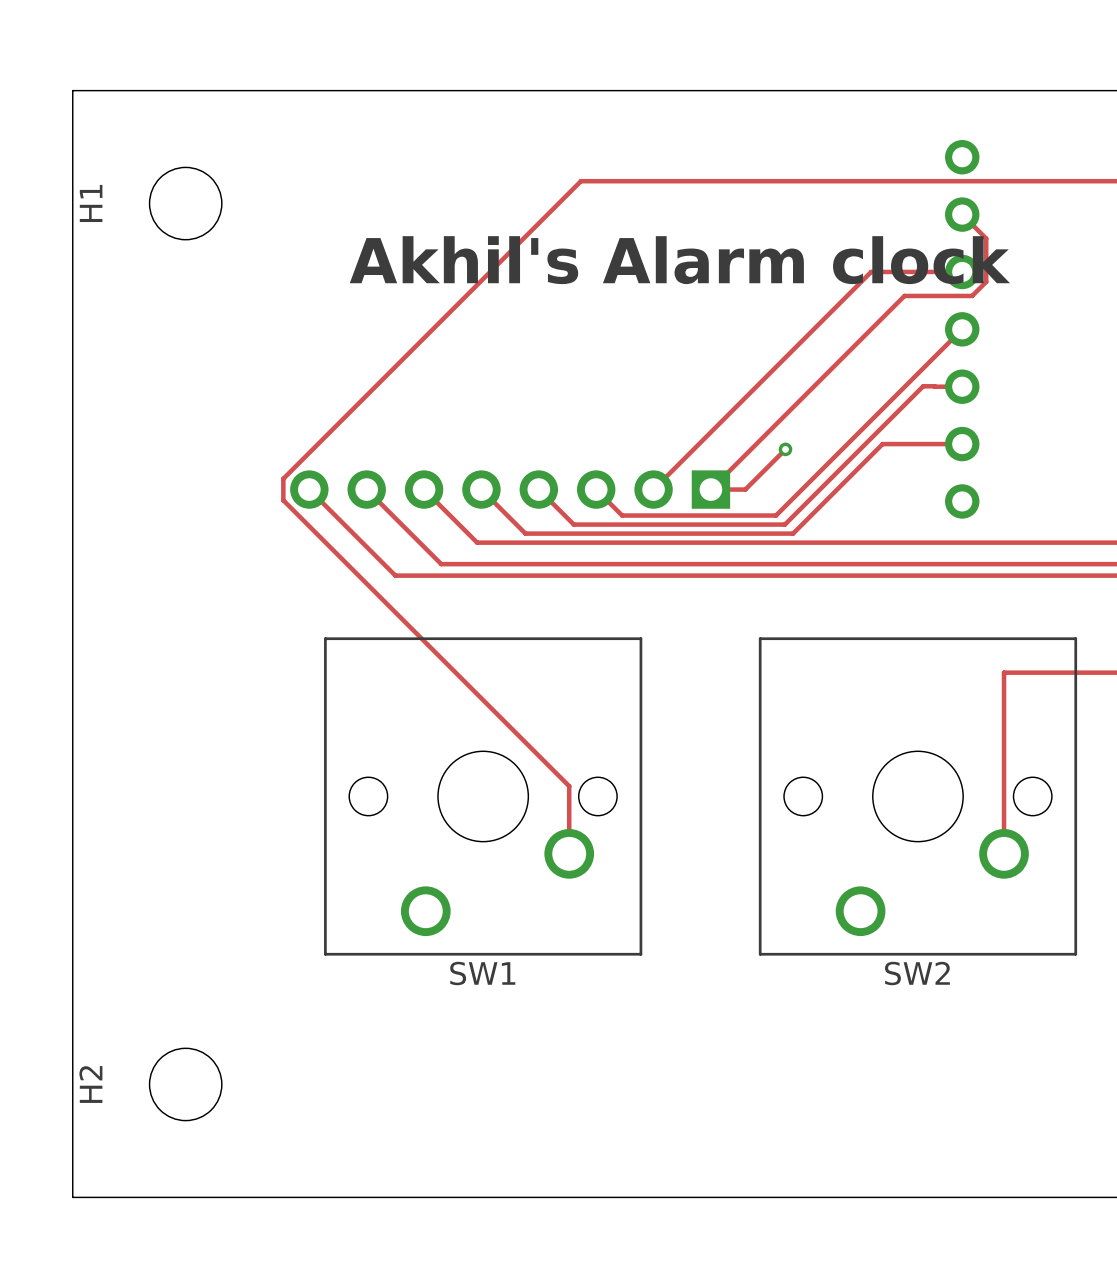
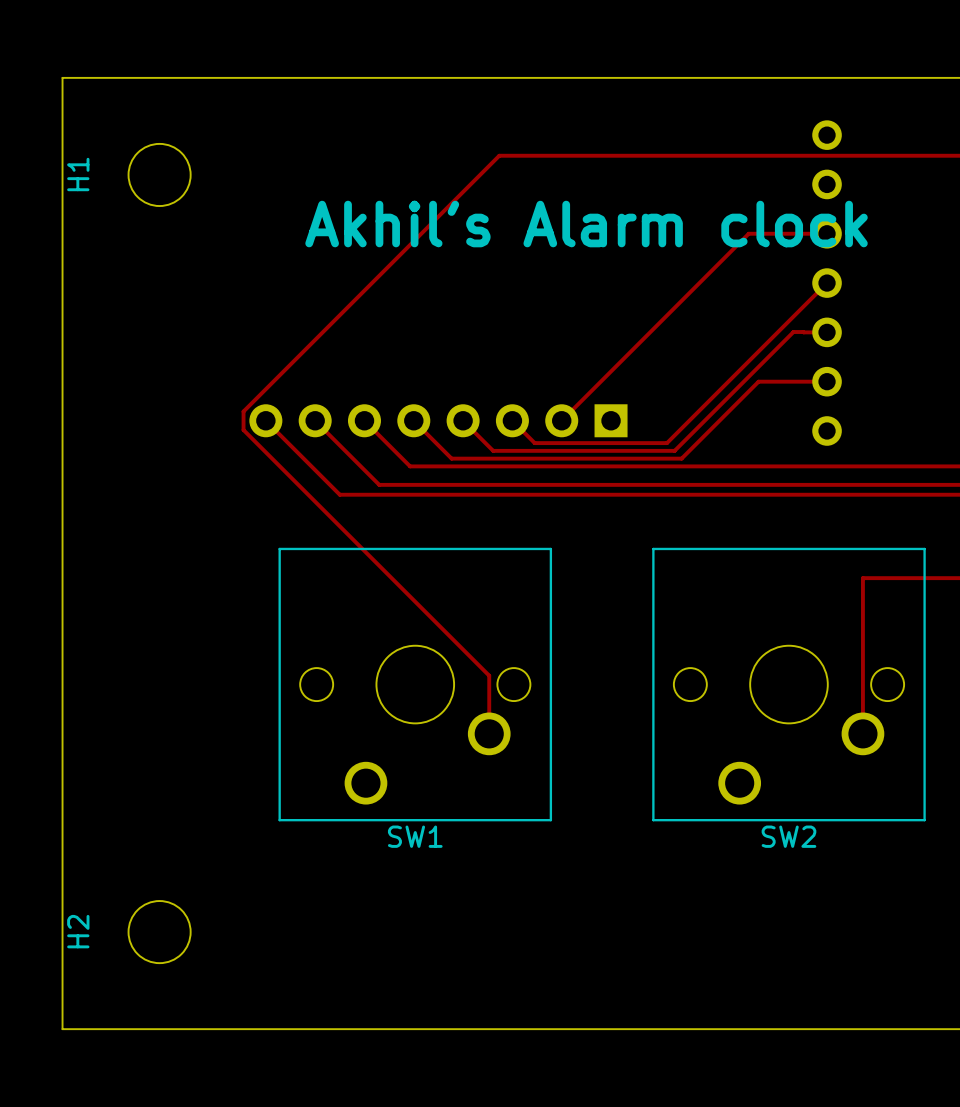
track: (962, 214) (986, 238) (986, 281) (972, 295) (904, 295) (710, 489) (745, 489) (785, 449) -> none
via: (785, 449) -> none

